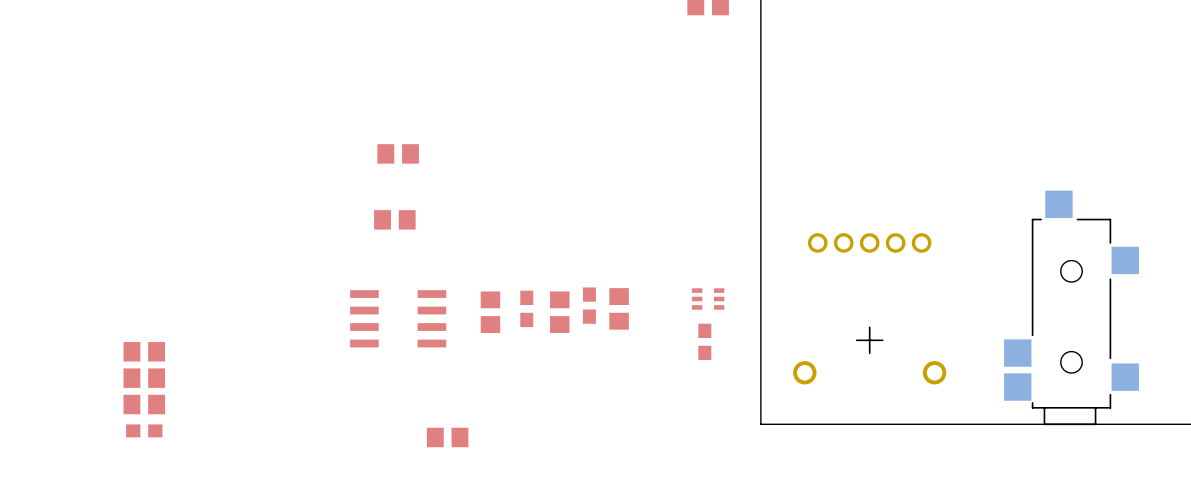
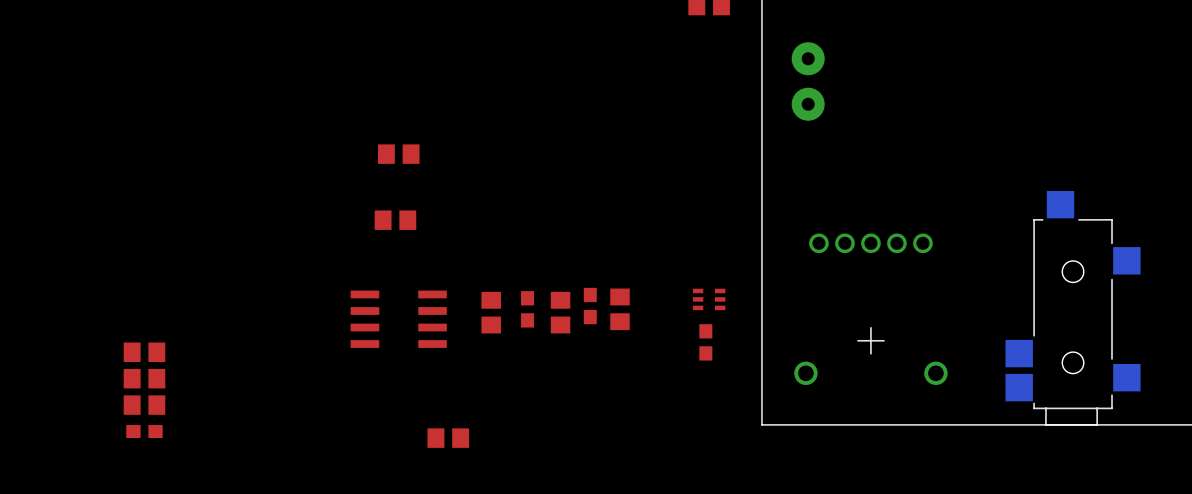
part: none -> (808, 81)

